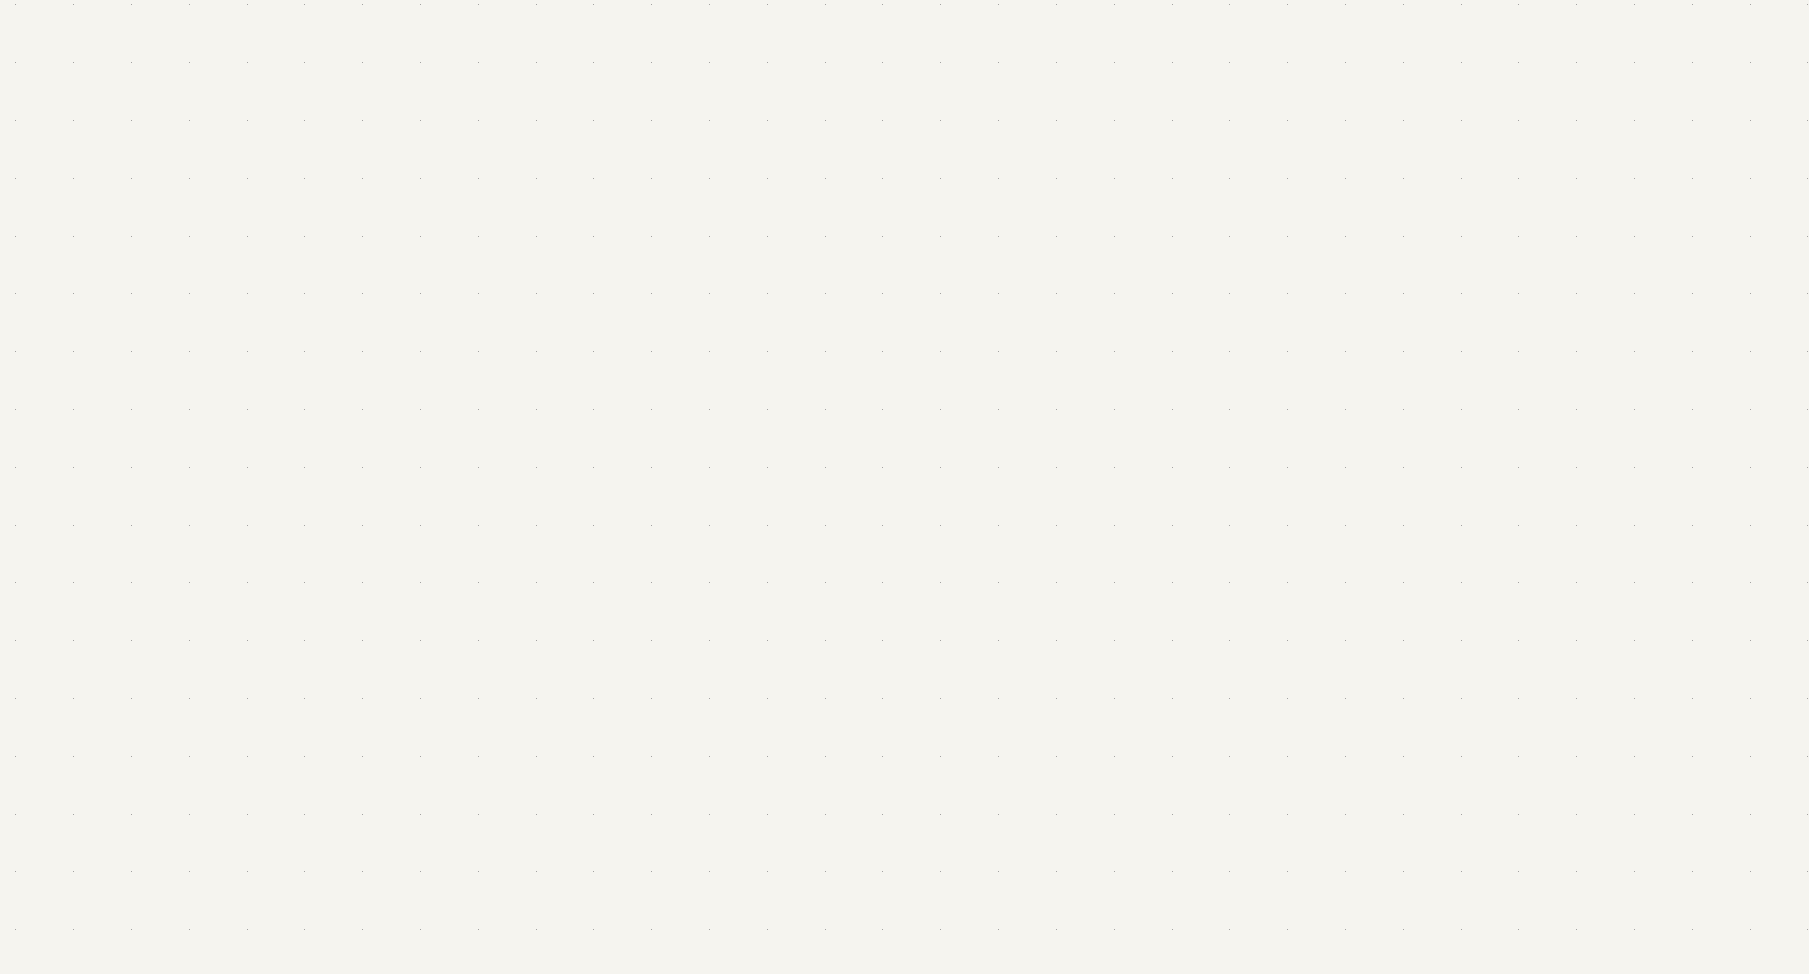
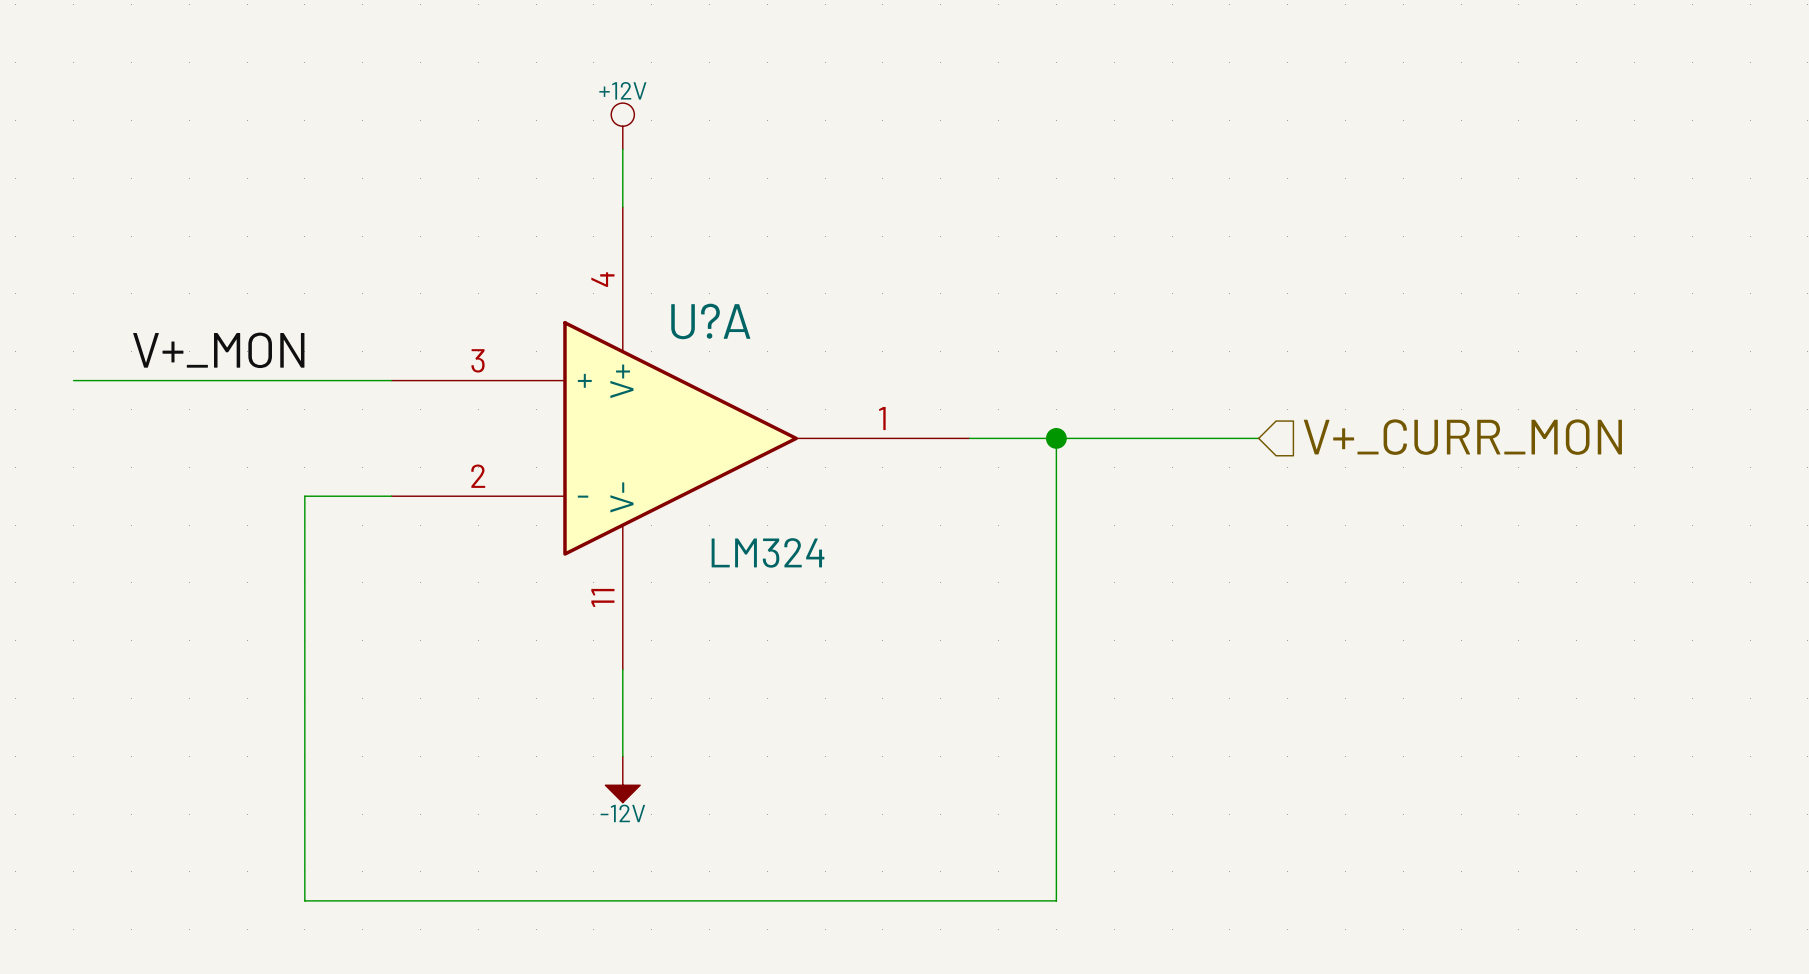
power symbol: none -> +12V (622, 126)
wire: none -> (622, 149) (622, 207)
label: none -> V+_MON (218, 350)
wire: none -> (73, 380) (391, 380)
hierarchical label: none -> V+_CURR_MON (1462, 437)
U?A: none -> LM324 (680, 438)
wire: none -> (969, 438) (1258, 438)
wire: none -> (1056, 438) (1056, 900) (304, 900) (304, 496) (391, 496)
junction: none -> (1056, 438)
wire: none -> (622, 669) (622, 756)
power symbol: none -> -12V (622, 779)

